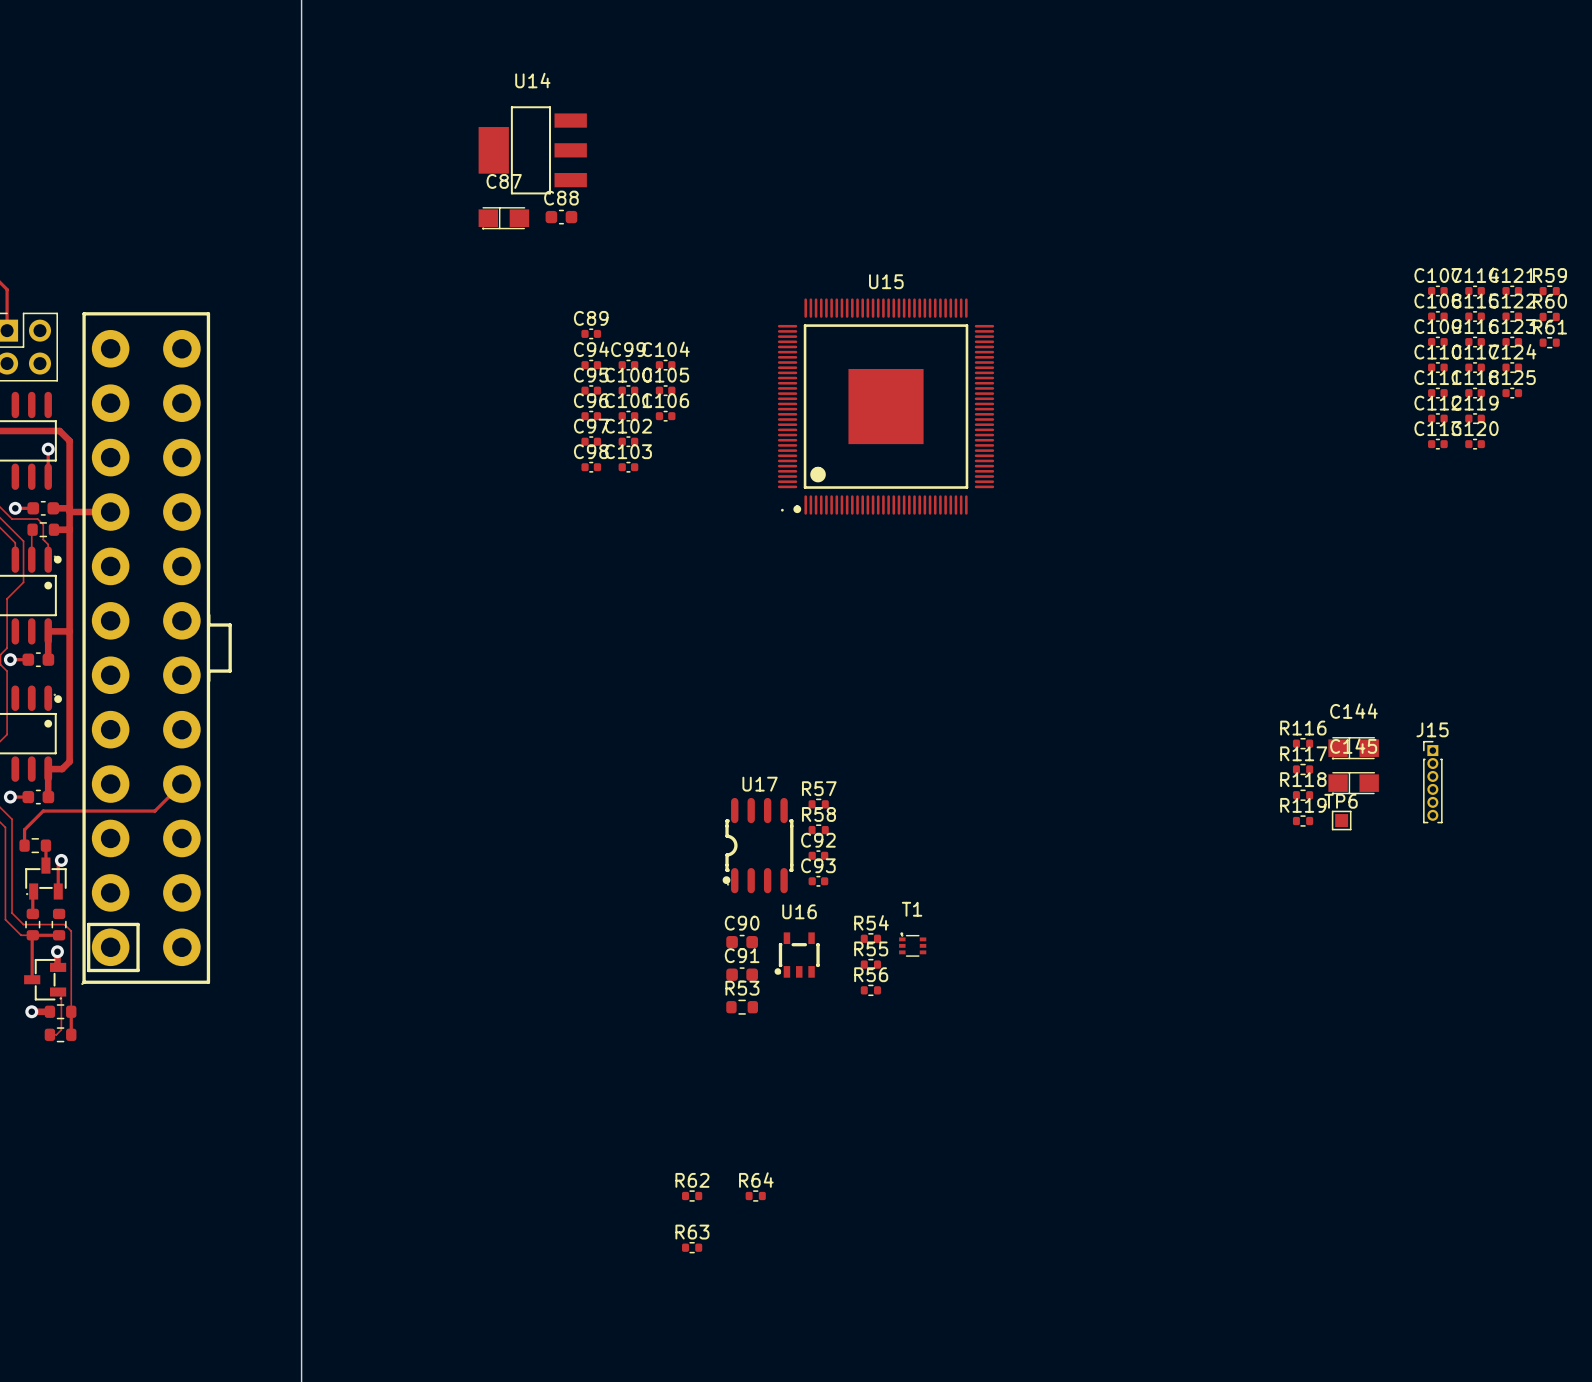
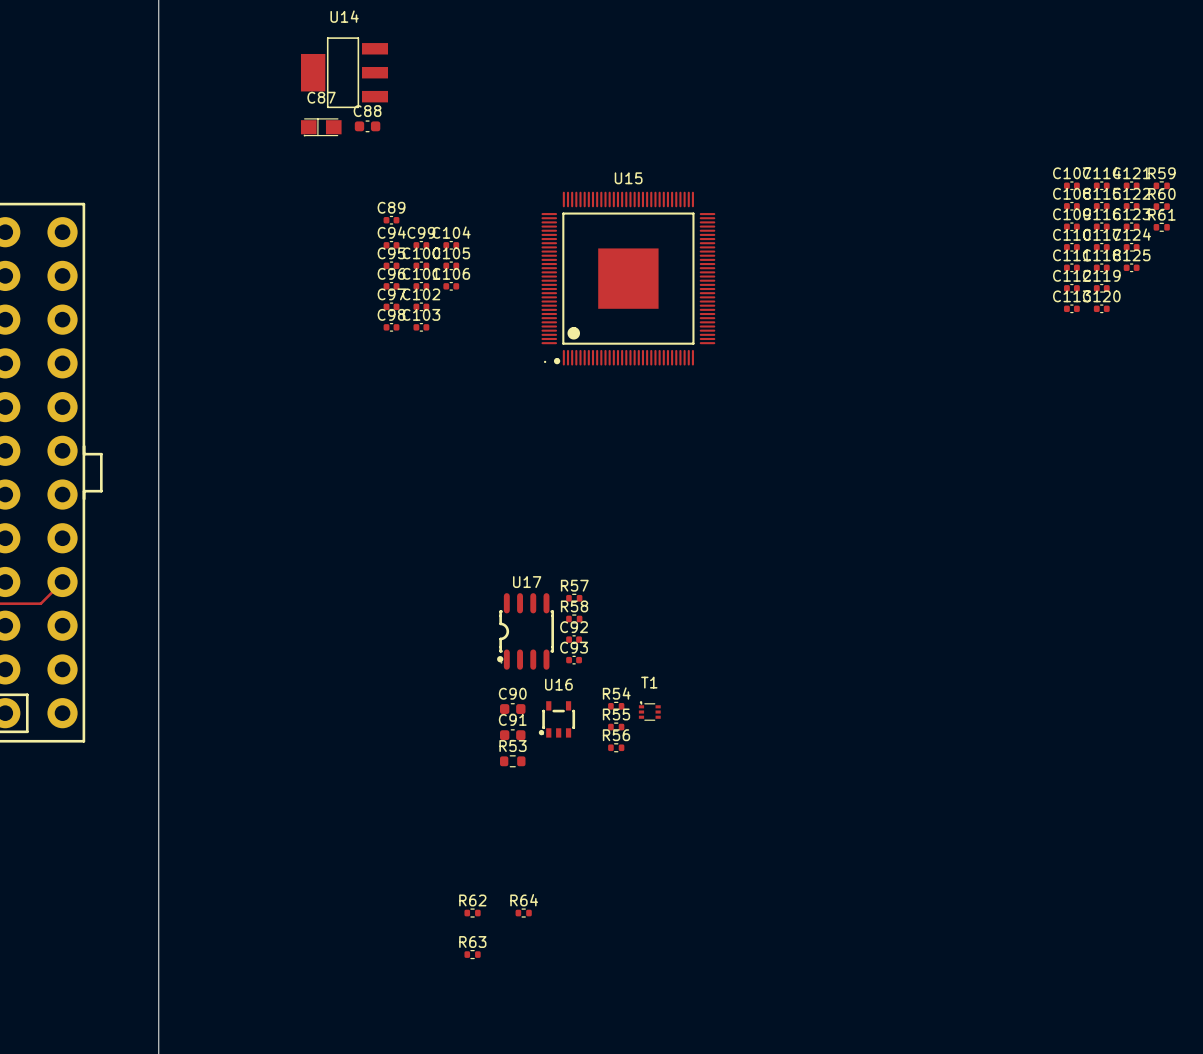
R116: (1303, 743) -> none
C144: (1353, 748) -> none
R117: (1303, 769) -> none
J15: (1432, 782) -> none
C145: (1353, 783) -> none
R118: (1303, 795) -> none
TP6: (1341, 820) -> none
R119: (1303, 821) -> none

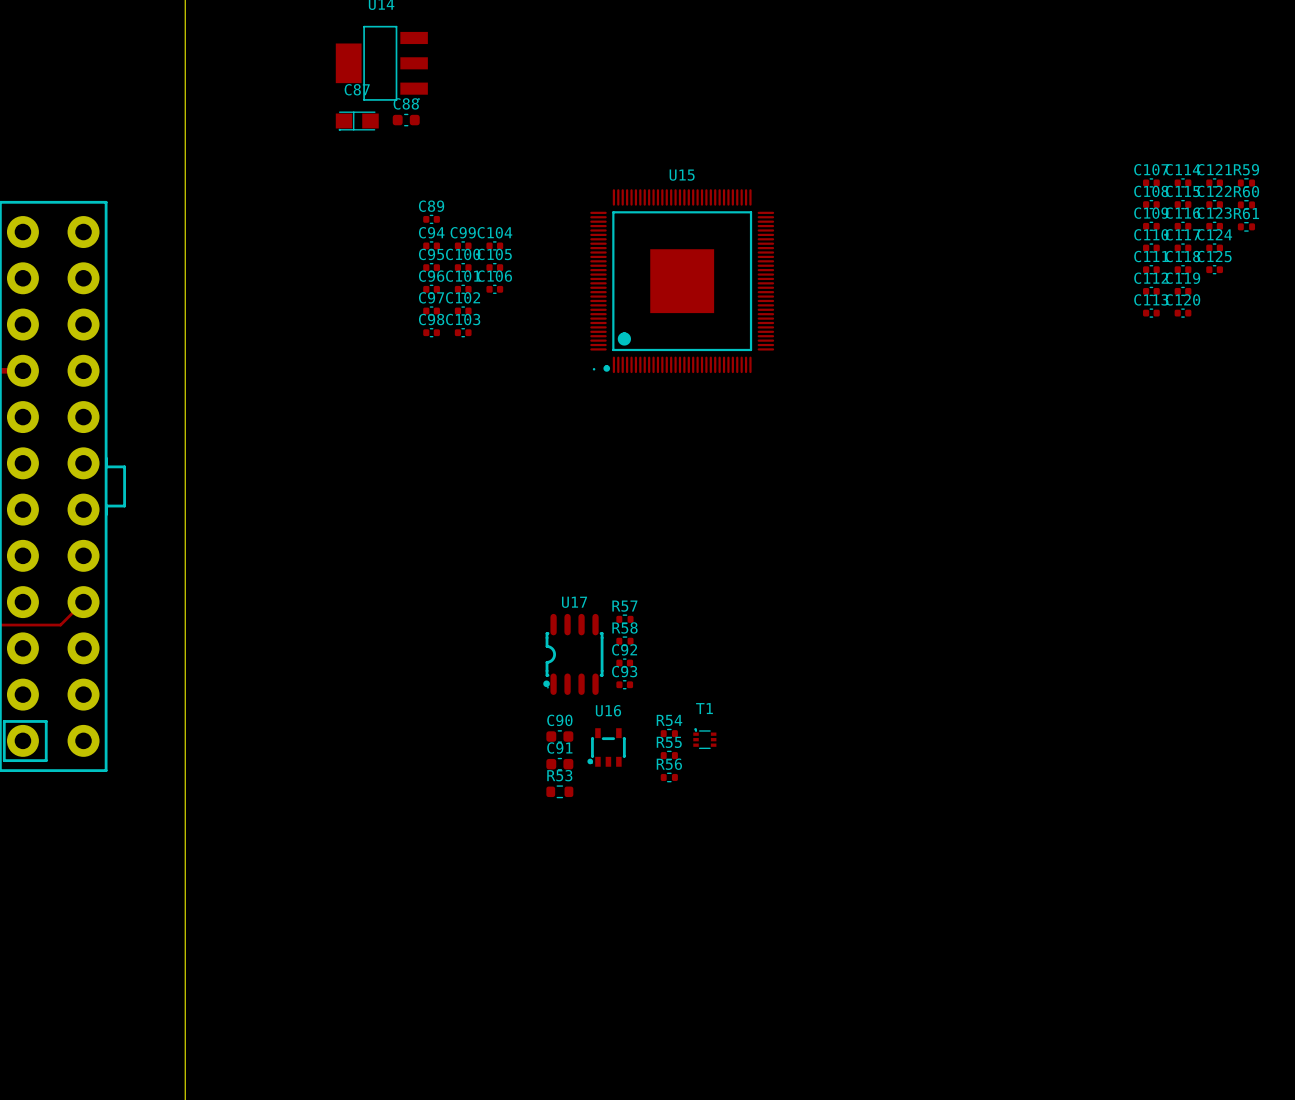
R62: (472, 913) -> none
R64: (523, 913) -> none
R63: (472, 954) -> none

